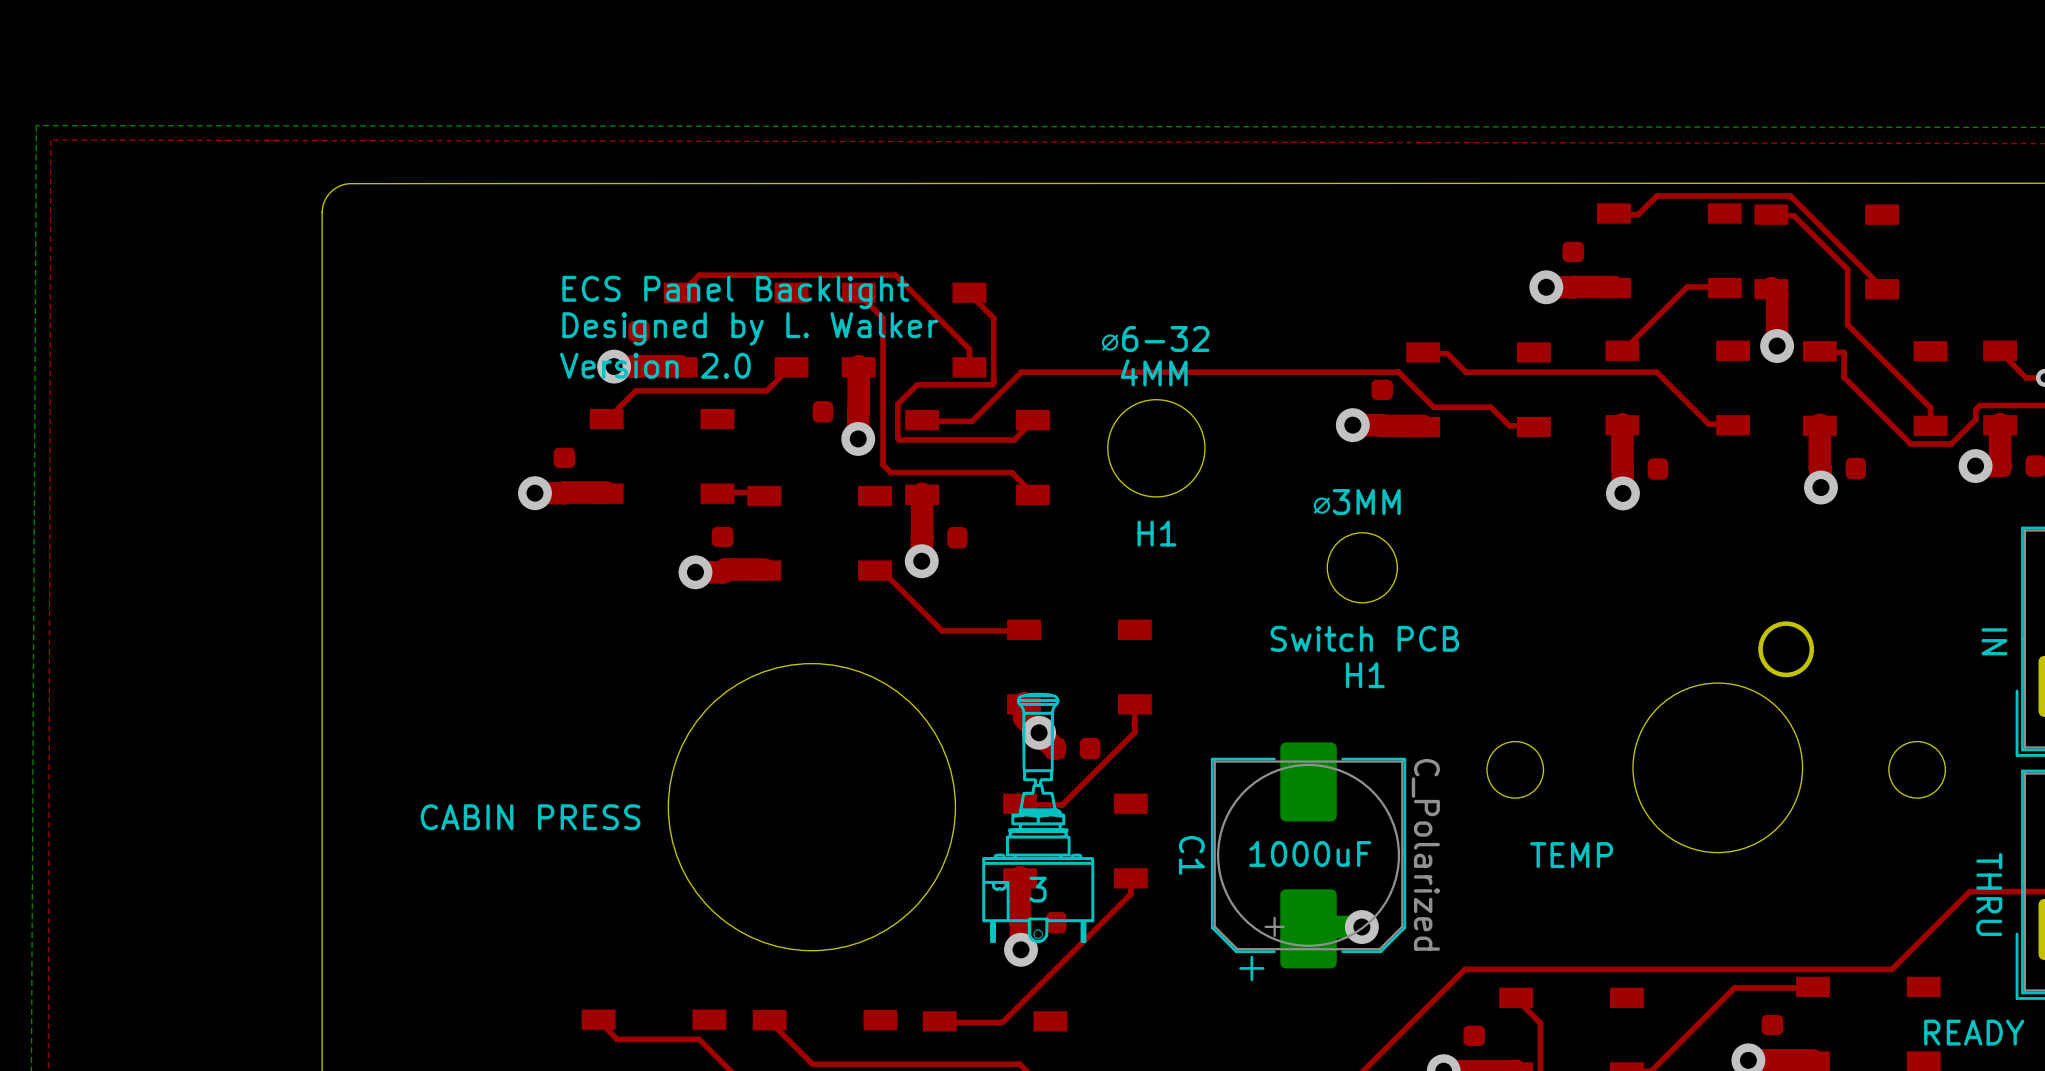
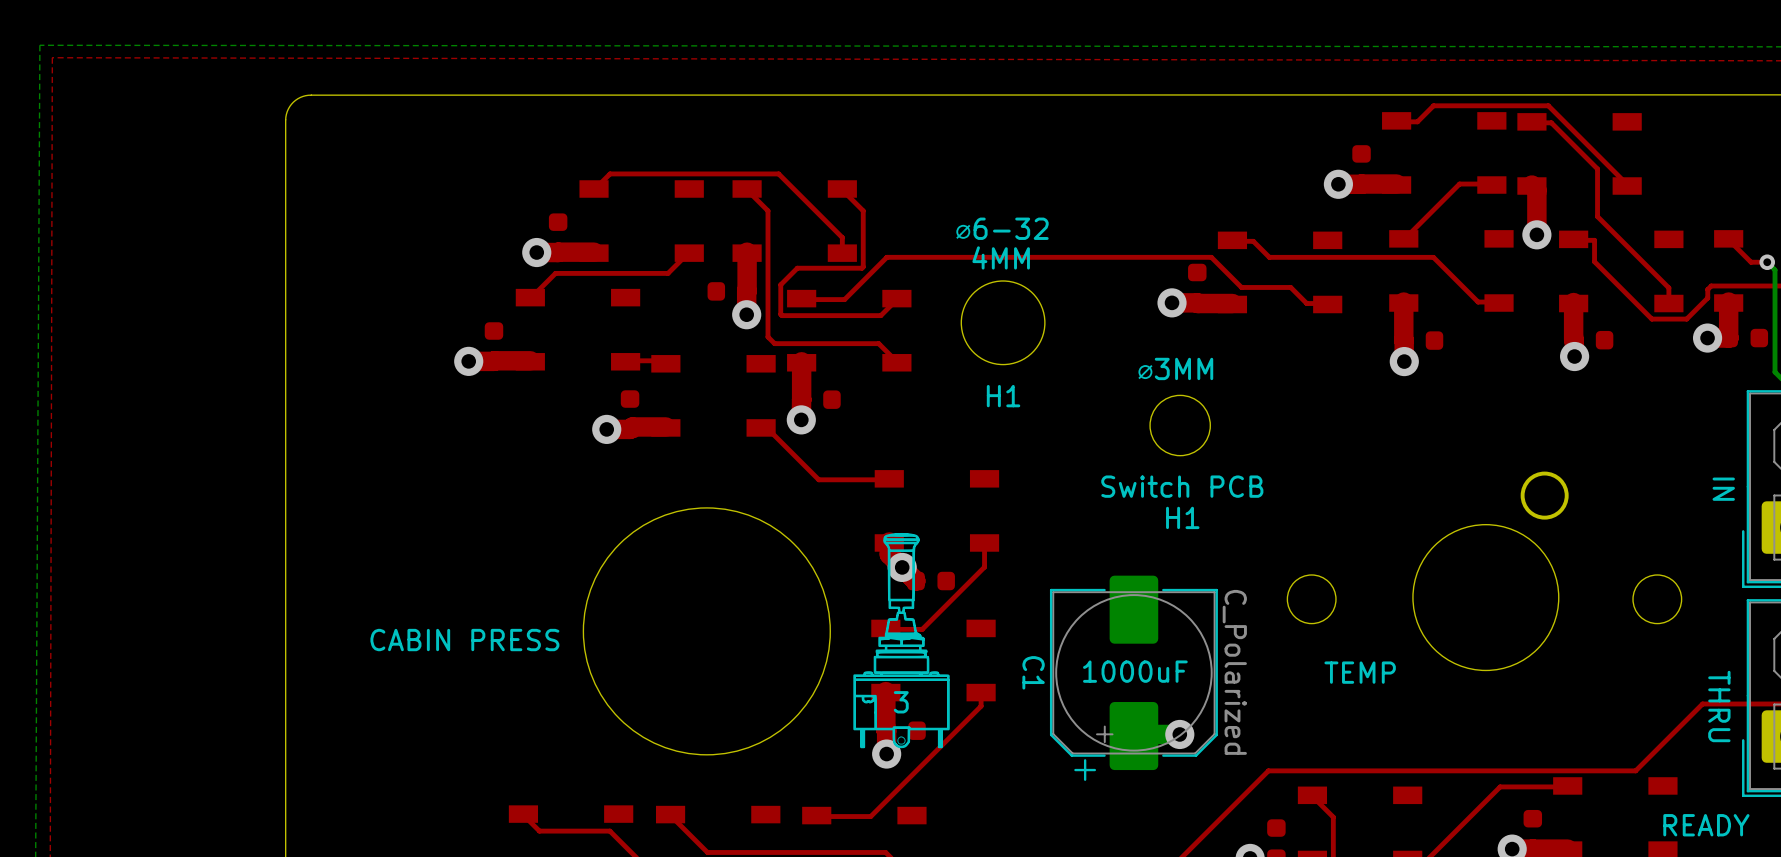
text: ECS Panel Backlight (735, 292) -> none
text: Designed by L. Walker (750, 328) -> none
text: Version 2.0 (655, 365) -> none

